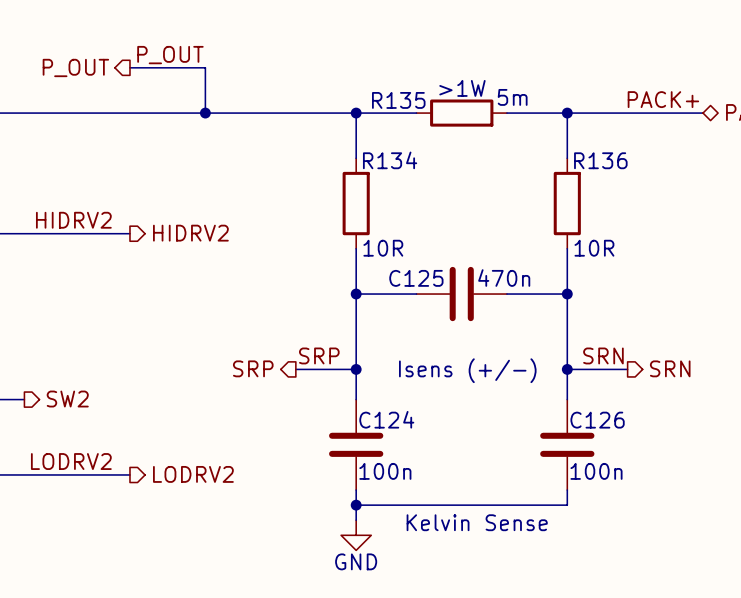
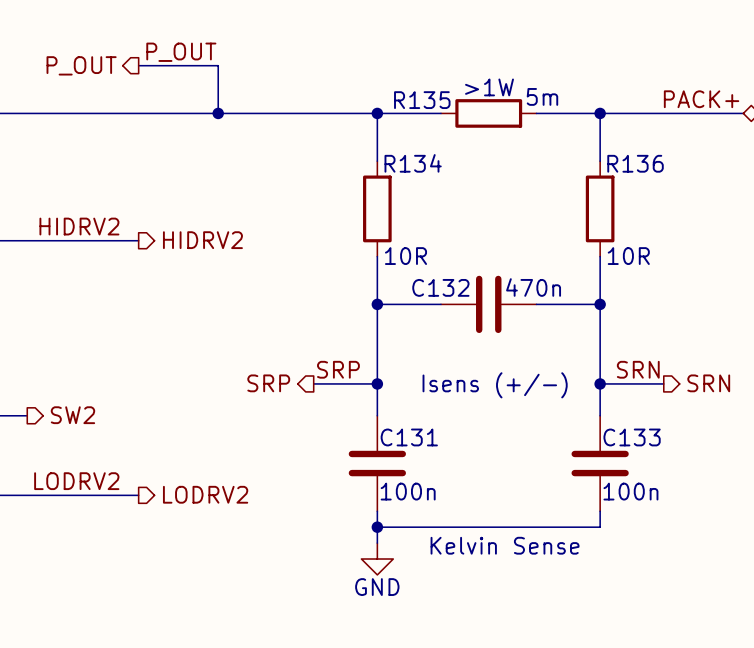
C125 name: C125 (416, 278) -> C132 (440, 287)
C124 name: C124 (386, 419) -> C131 (409, 437)
C126 name: C126 (597, 420) -> C133 (632, 437)

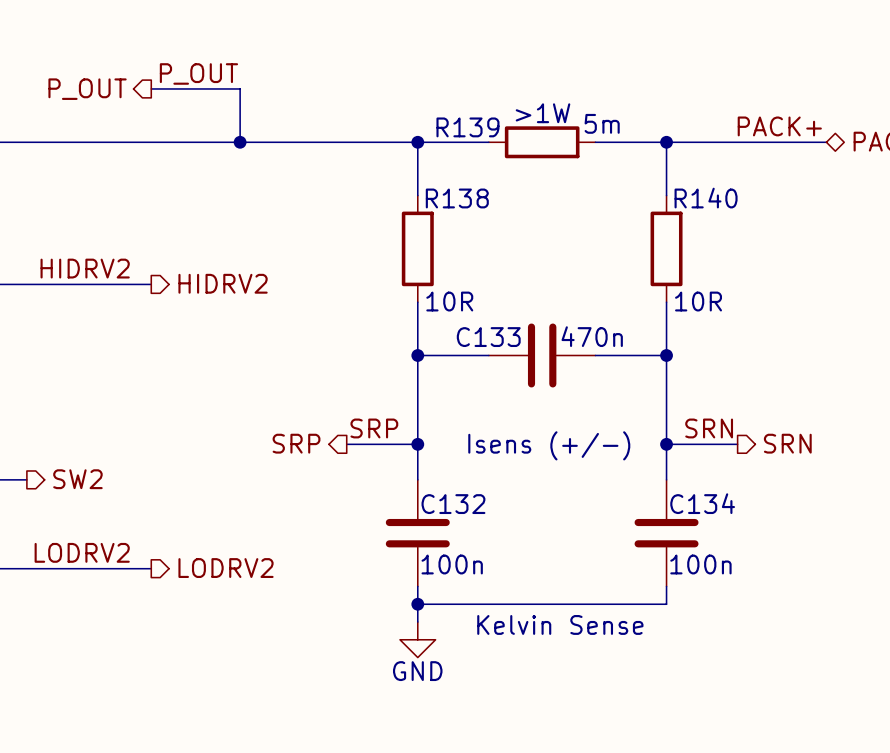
R135 name: R135 (422, 100) -> R139 (467, 127)
R134 name: R134 (413, 163) -> R138 (457, 198)
R136 name: R136 (635, 163) -> R140 (706, 198)
C132 name: C132 (440, 287) -> C133 (488, 337)
C131 name: C131 (409, 437) -> C132 (453, 504)
C133 name: C133 (632, 437) -> C134 (702, 503)

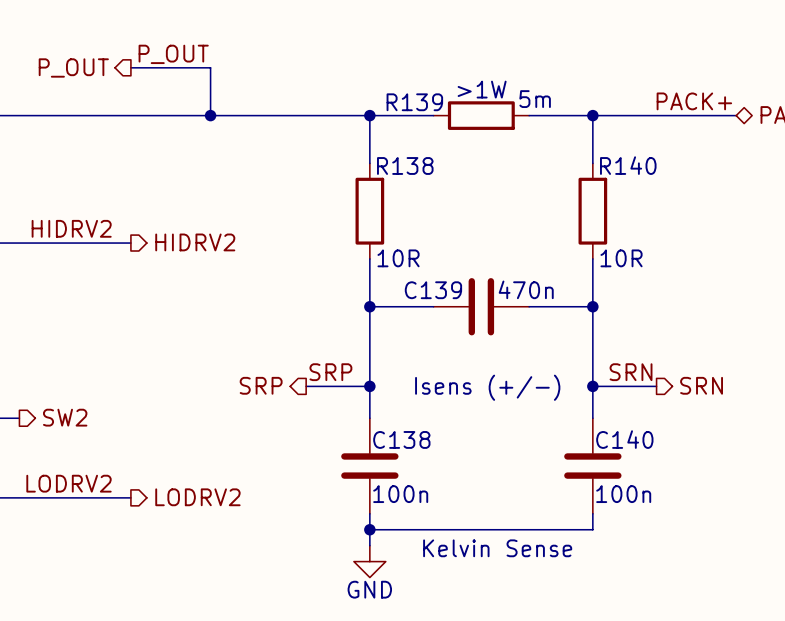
C133 name: C133 (488, 337) -> C139 (433, 290)
C134 name: C134 (702, 503) -> C140 (624, 439)
C132 name: C132 (453, 504) -> C138 (401, 439)

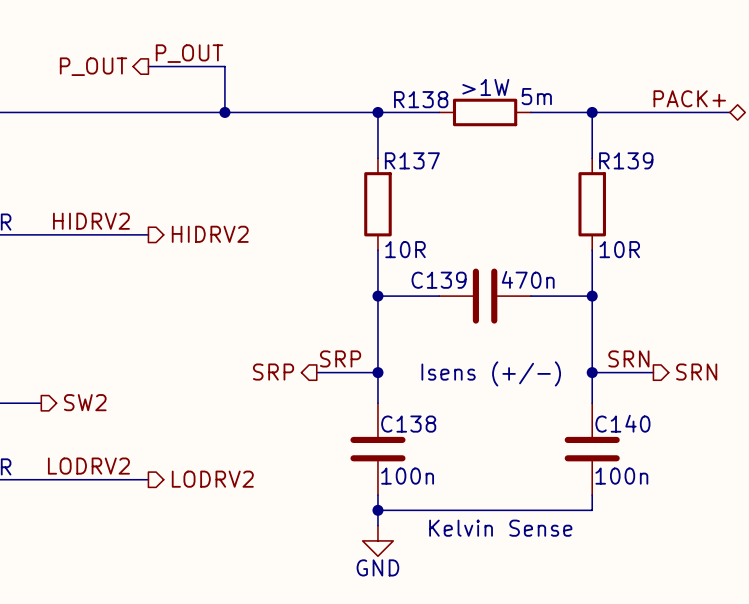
R139 name: R139 (414, 102) -> R138 (421, 99)
R138 name: R138 (405, 165) -> R137 (412, 160)
R140 name: R140 (628, 165) -> R139 (626, 160)

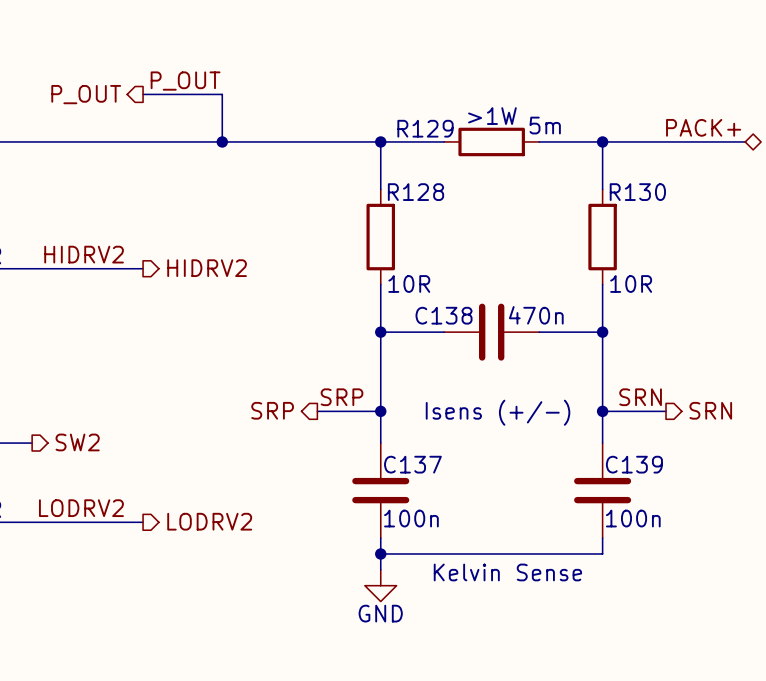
R138 name: R138 (421, 99) -> R129 (425, 128)
R137 name: R137 (412, 160) -> R128 (415, 192)
R139 name: R139 (626, 160) -> R130 (637, 192)
C139 name: C139 (439, 280) -> C138 (444, 315)
C140 name: C140 (622, 423) -> C139 (634, 464)
C138 name: C138 (408, 424) -> C137 (412, 464)

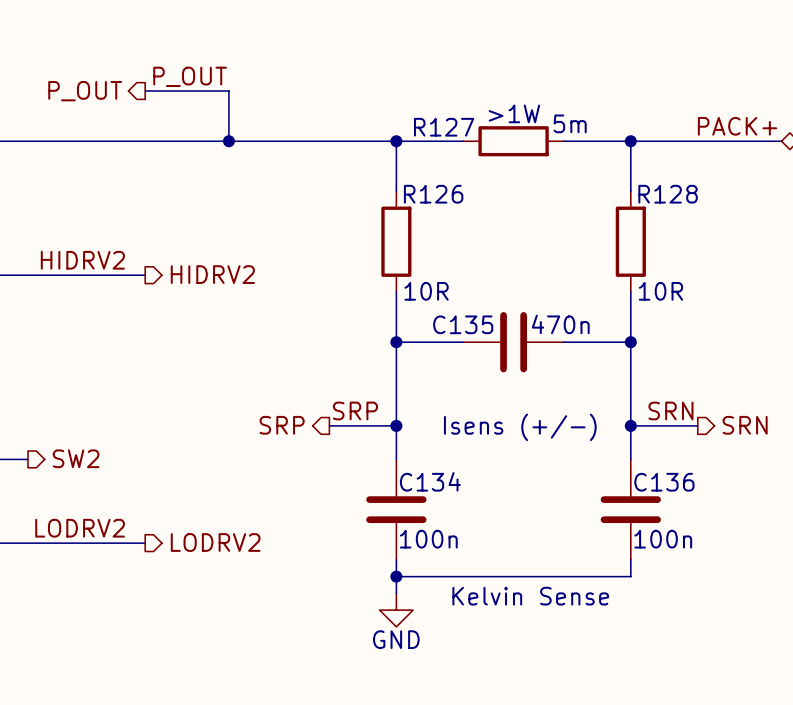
R129 name: R129 (425, 128) -> R127 (444, 127)
R128 name: R128 (415, 192) -> R126 (433, 194)
R130 name: R130 (637, 192) -> R128 (668, 194)
C138 name: C138 (444, 315) -> C135 (463, 324)
C137 name: C137 (412, 464) -> C134 (430, 481)
C139 name: C139 (634, 464) -> C136 (664, 482)

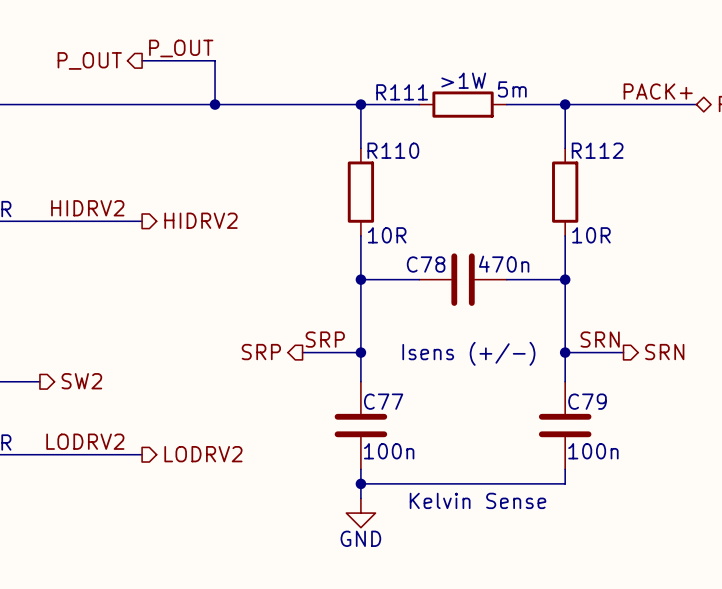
R127 name: R127 (444, 127) -> R111 (402, 92)
R126 name: R126 (433, 194) -> R110 (393, 150)
R128 name: R128 (668, 194) -> R112 (597, 150)
C135 name: C135 (463, 324) -> C78 (426, 264)
C134 name: C134 (430, 481) -> C77 (383, 401)
C136 name: C136 (664, 482) -> C79 (587, 401)

